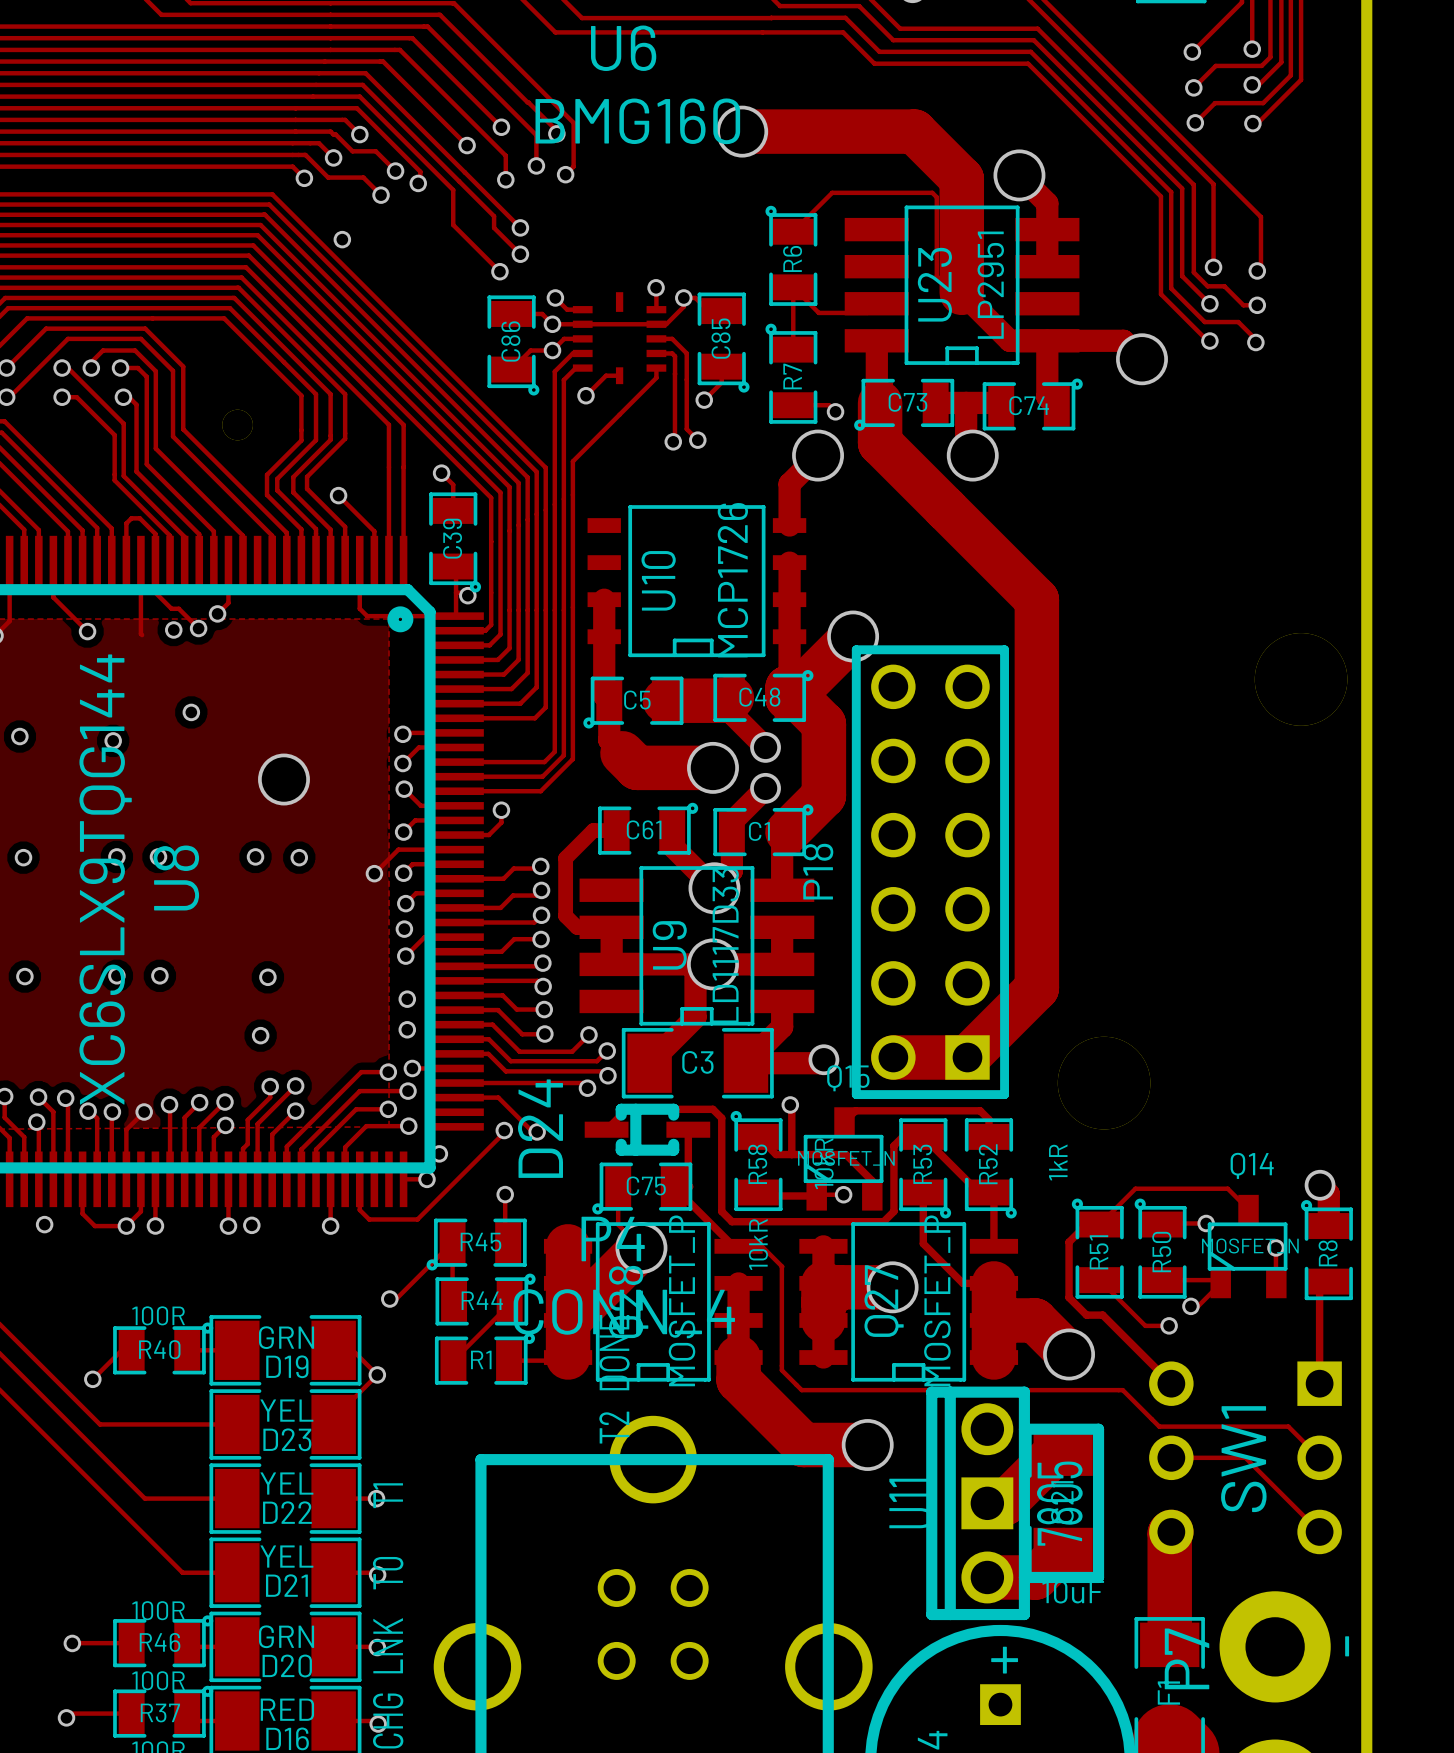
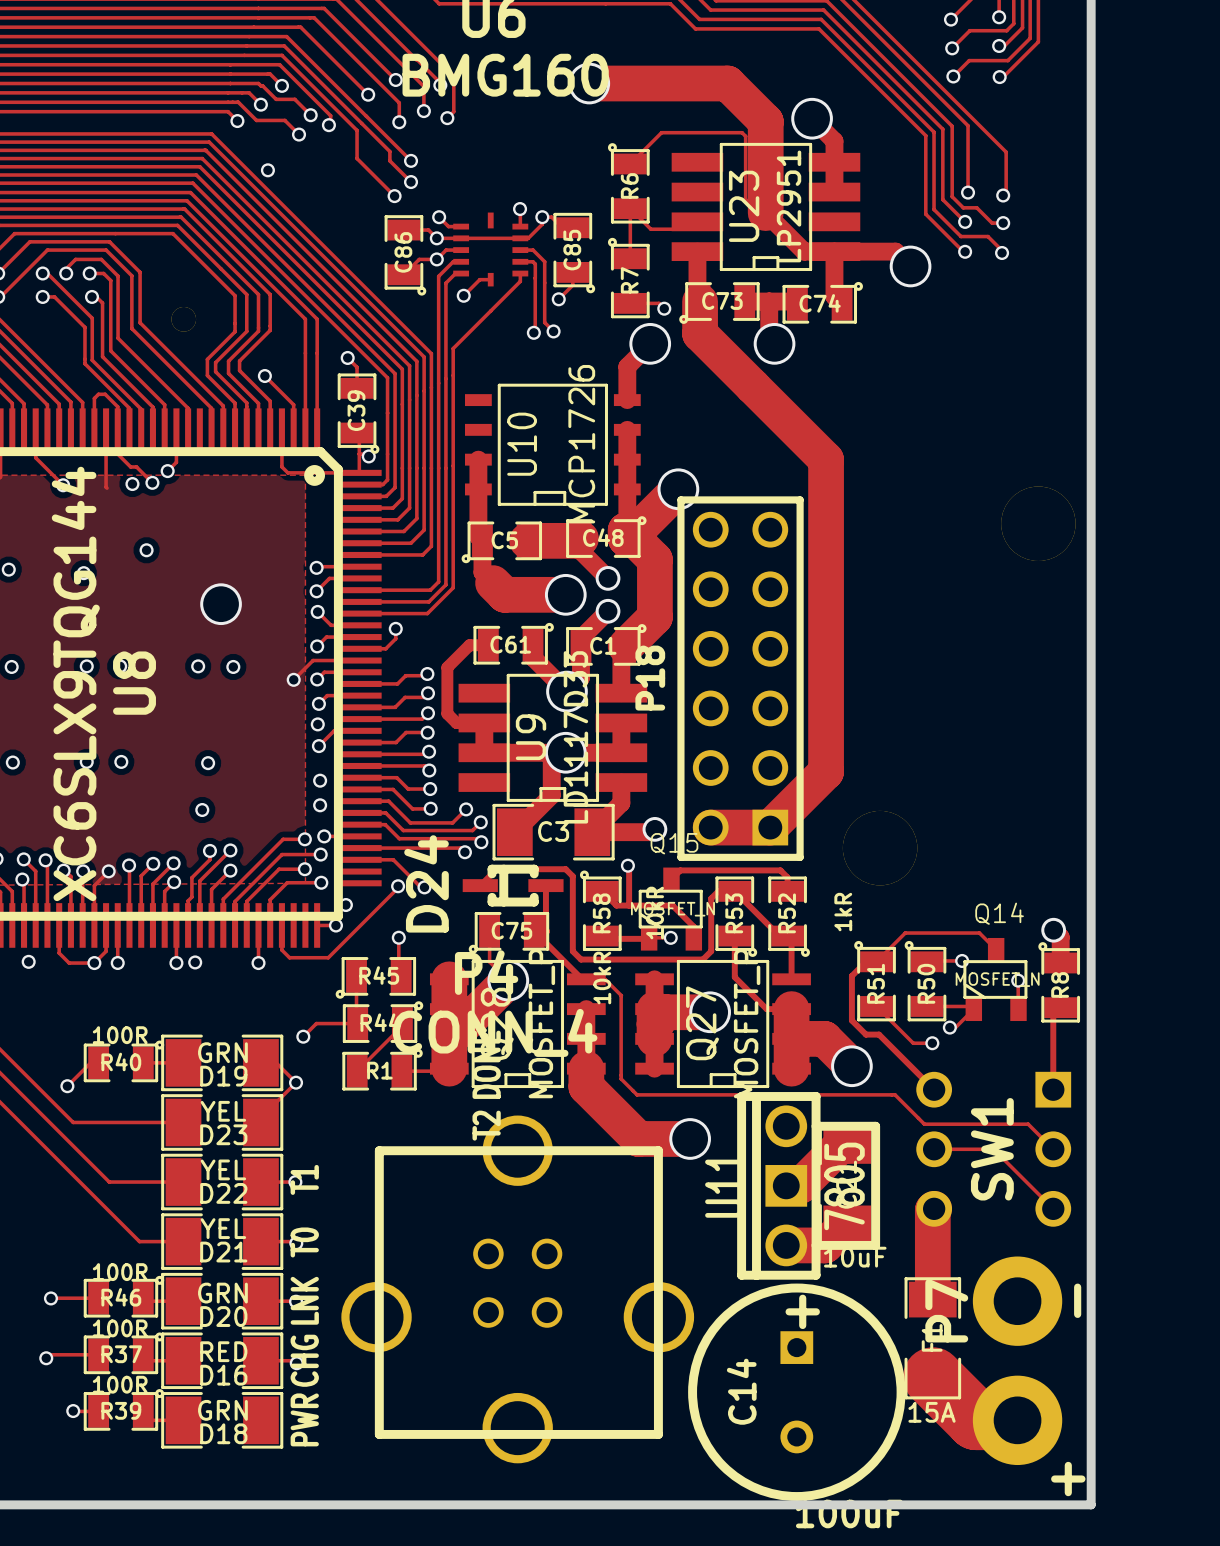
track: (452, 1242) (396, 1299) (389, 1299) -> none
via position: (389, 1299) -> (303, 1036)
track: none -> (357, 1023) (316, 1023) (303, 1036)

